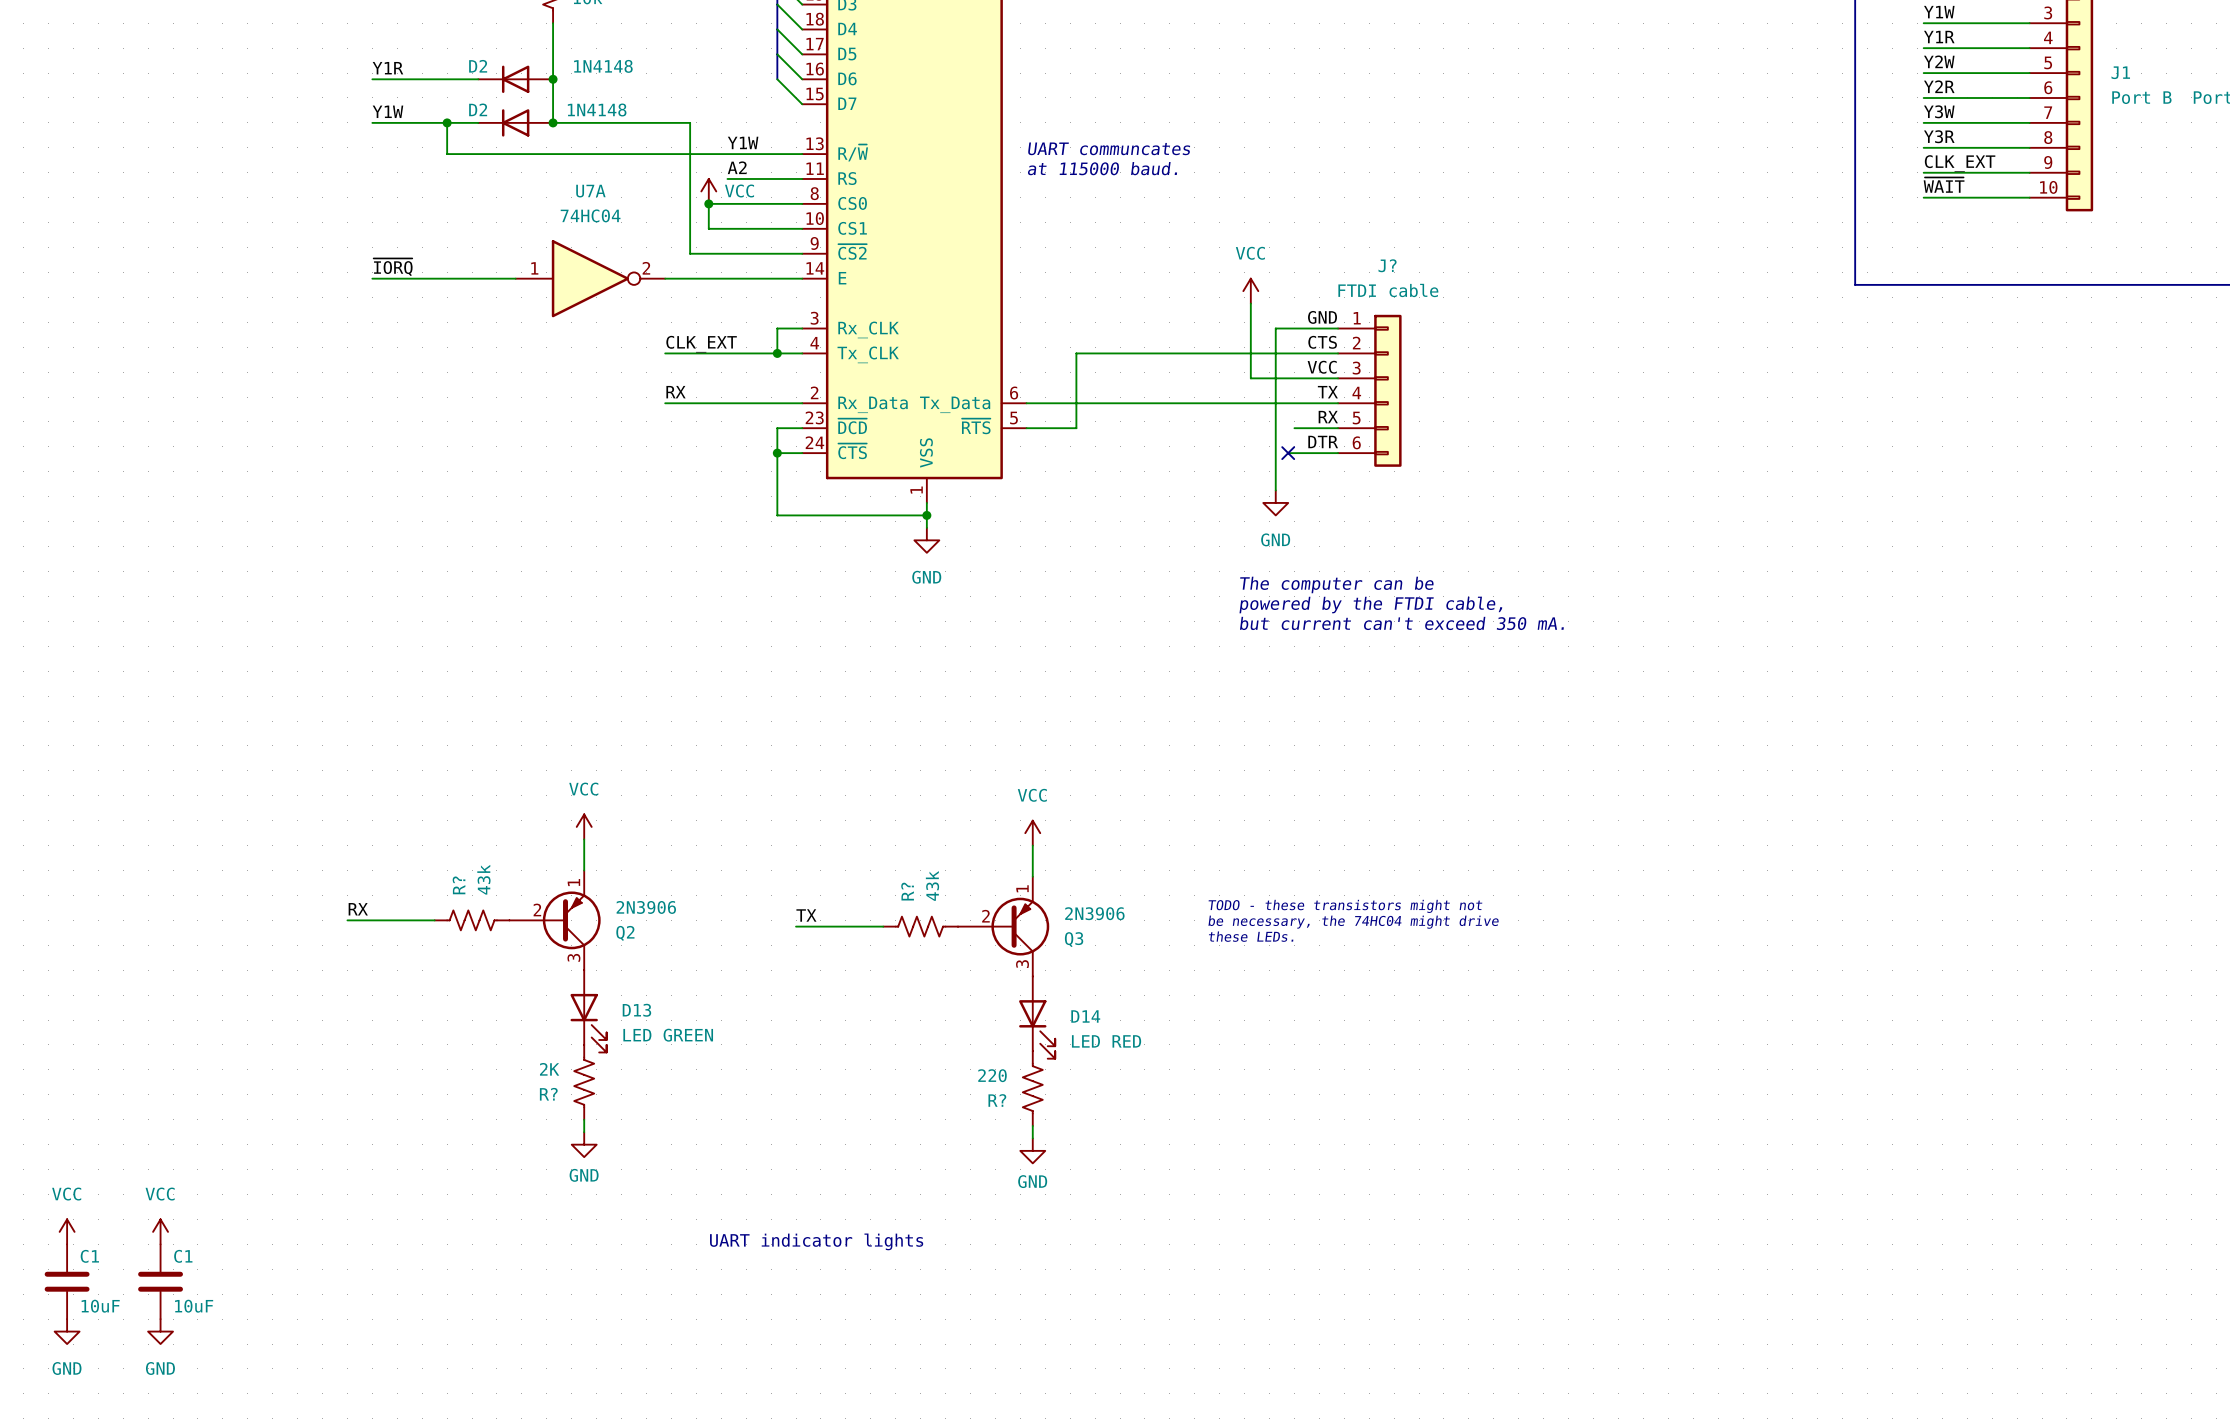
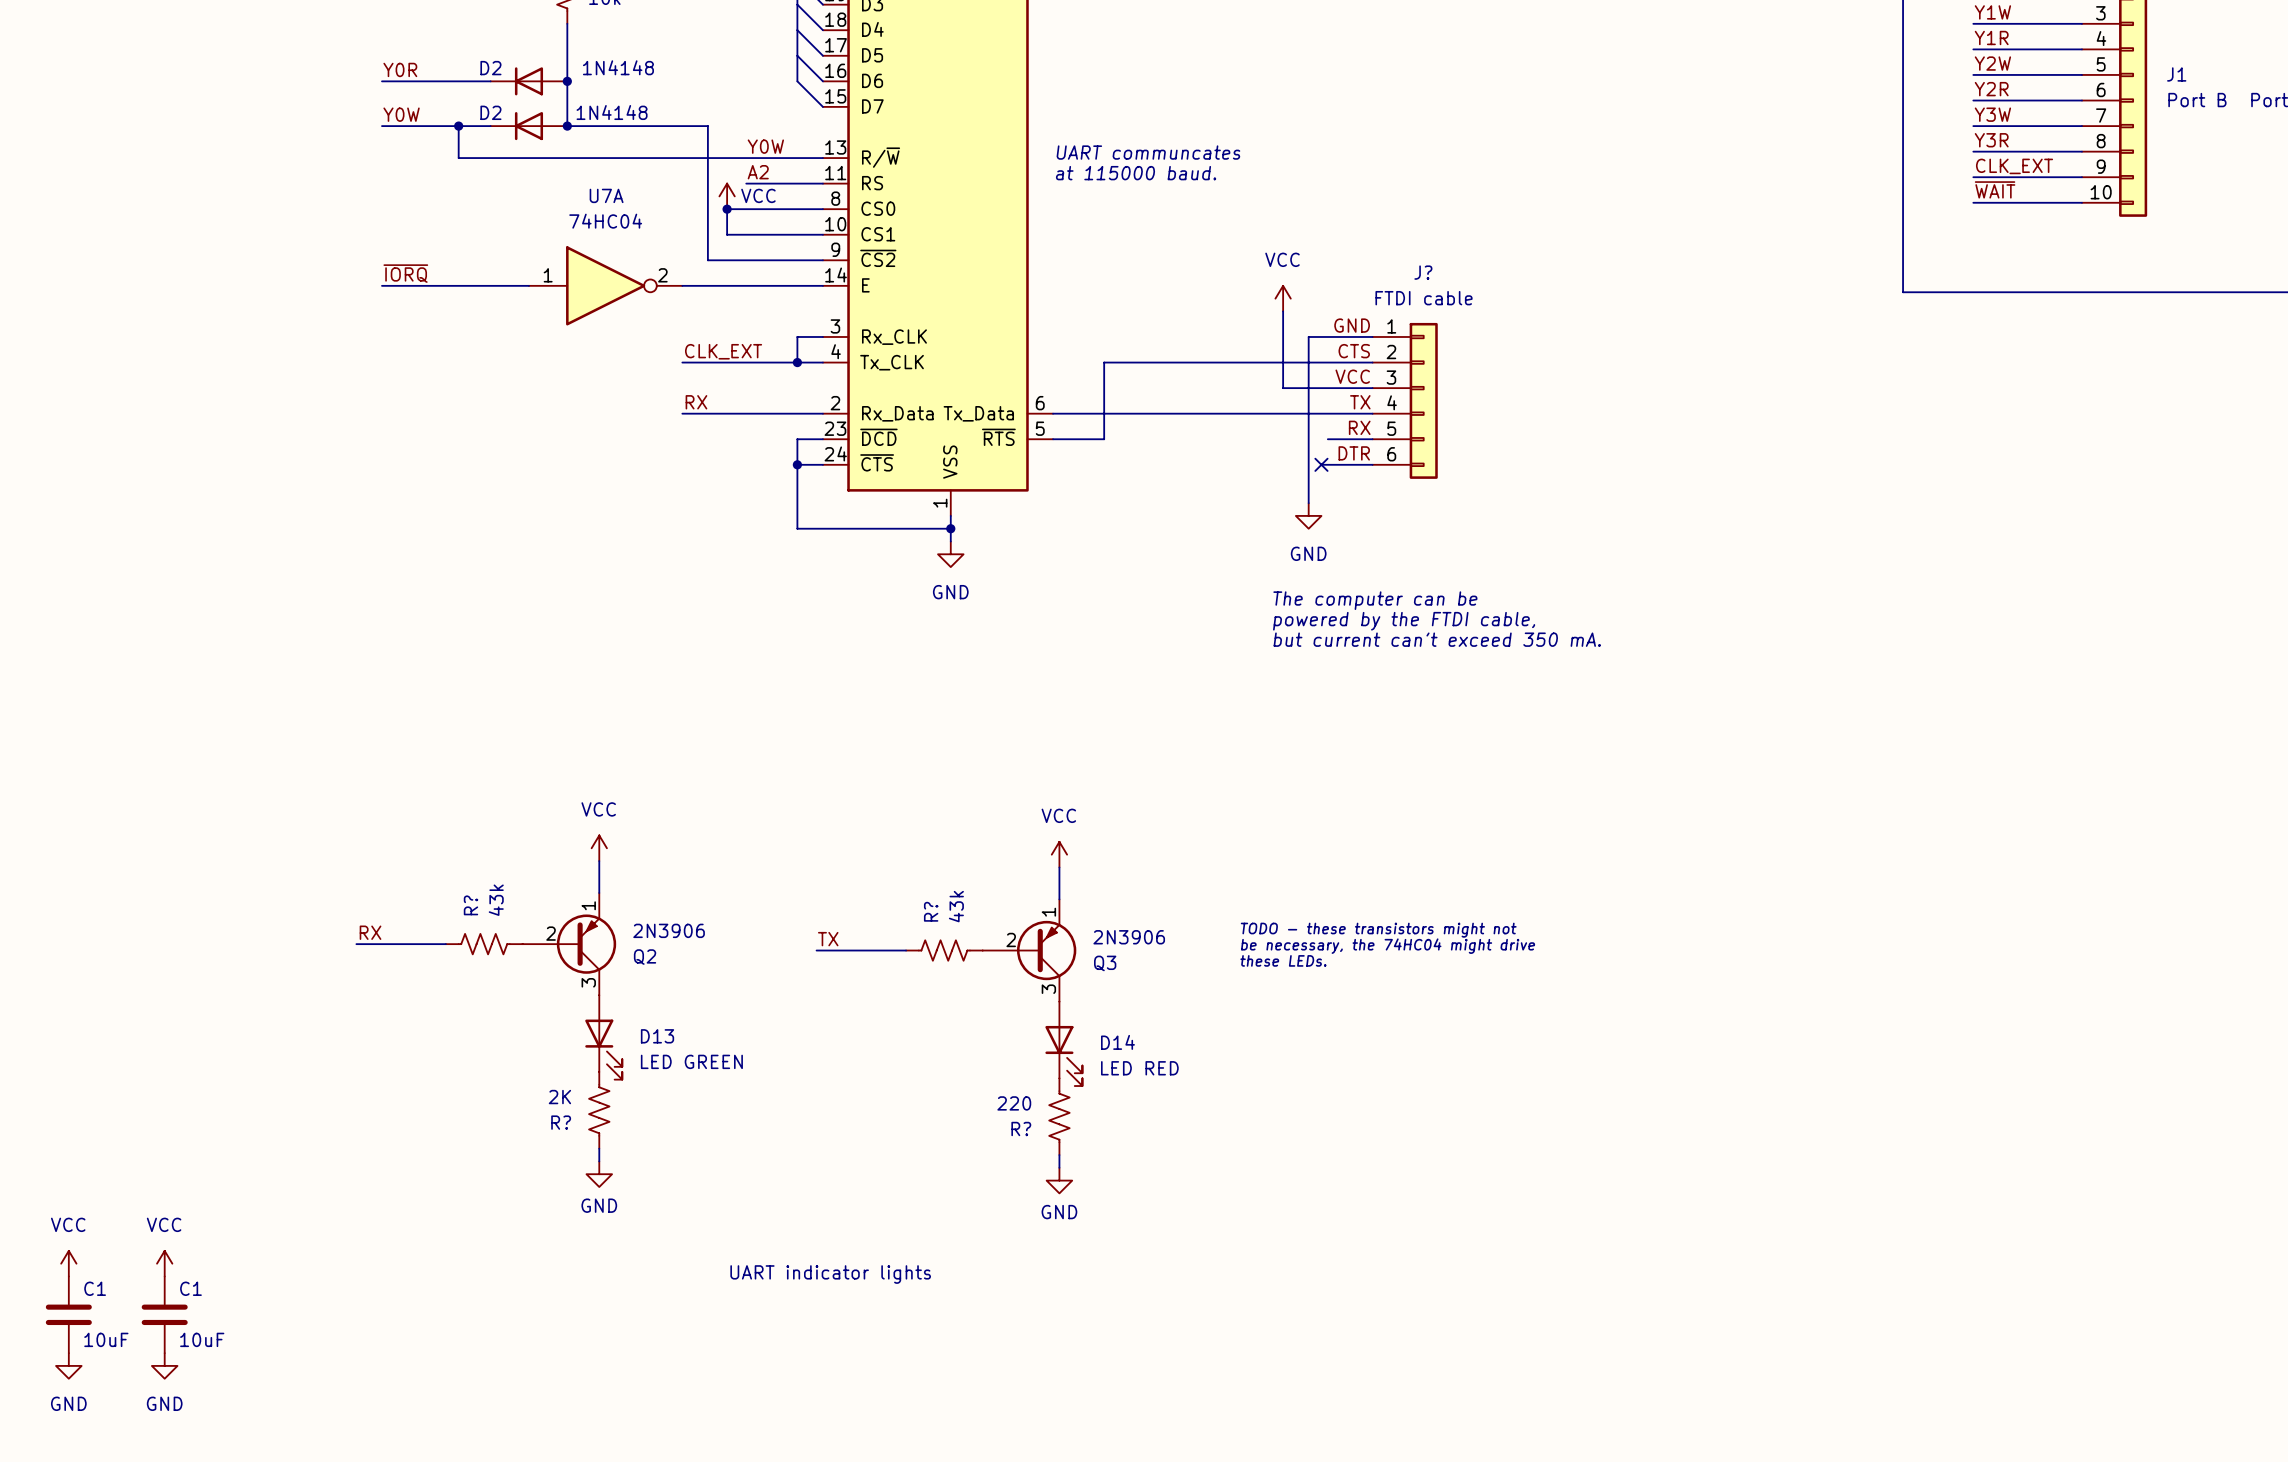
label: Y1R (387, 68) -> Y0R (400, 69)
label: Y1W (387, 111) -> Y0W (401, 114)
label: Y1W (743, 142) -> Y0W (765, 146)

